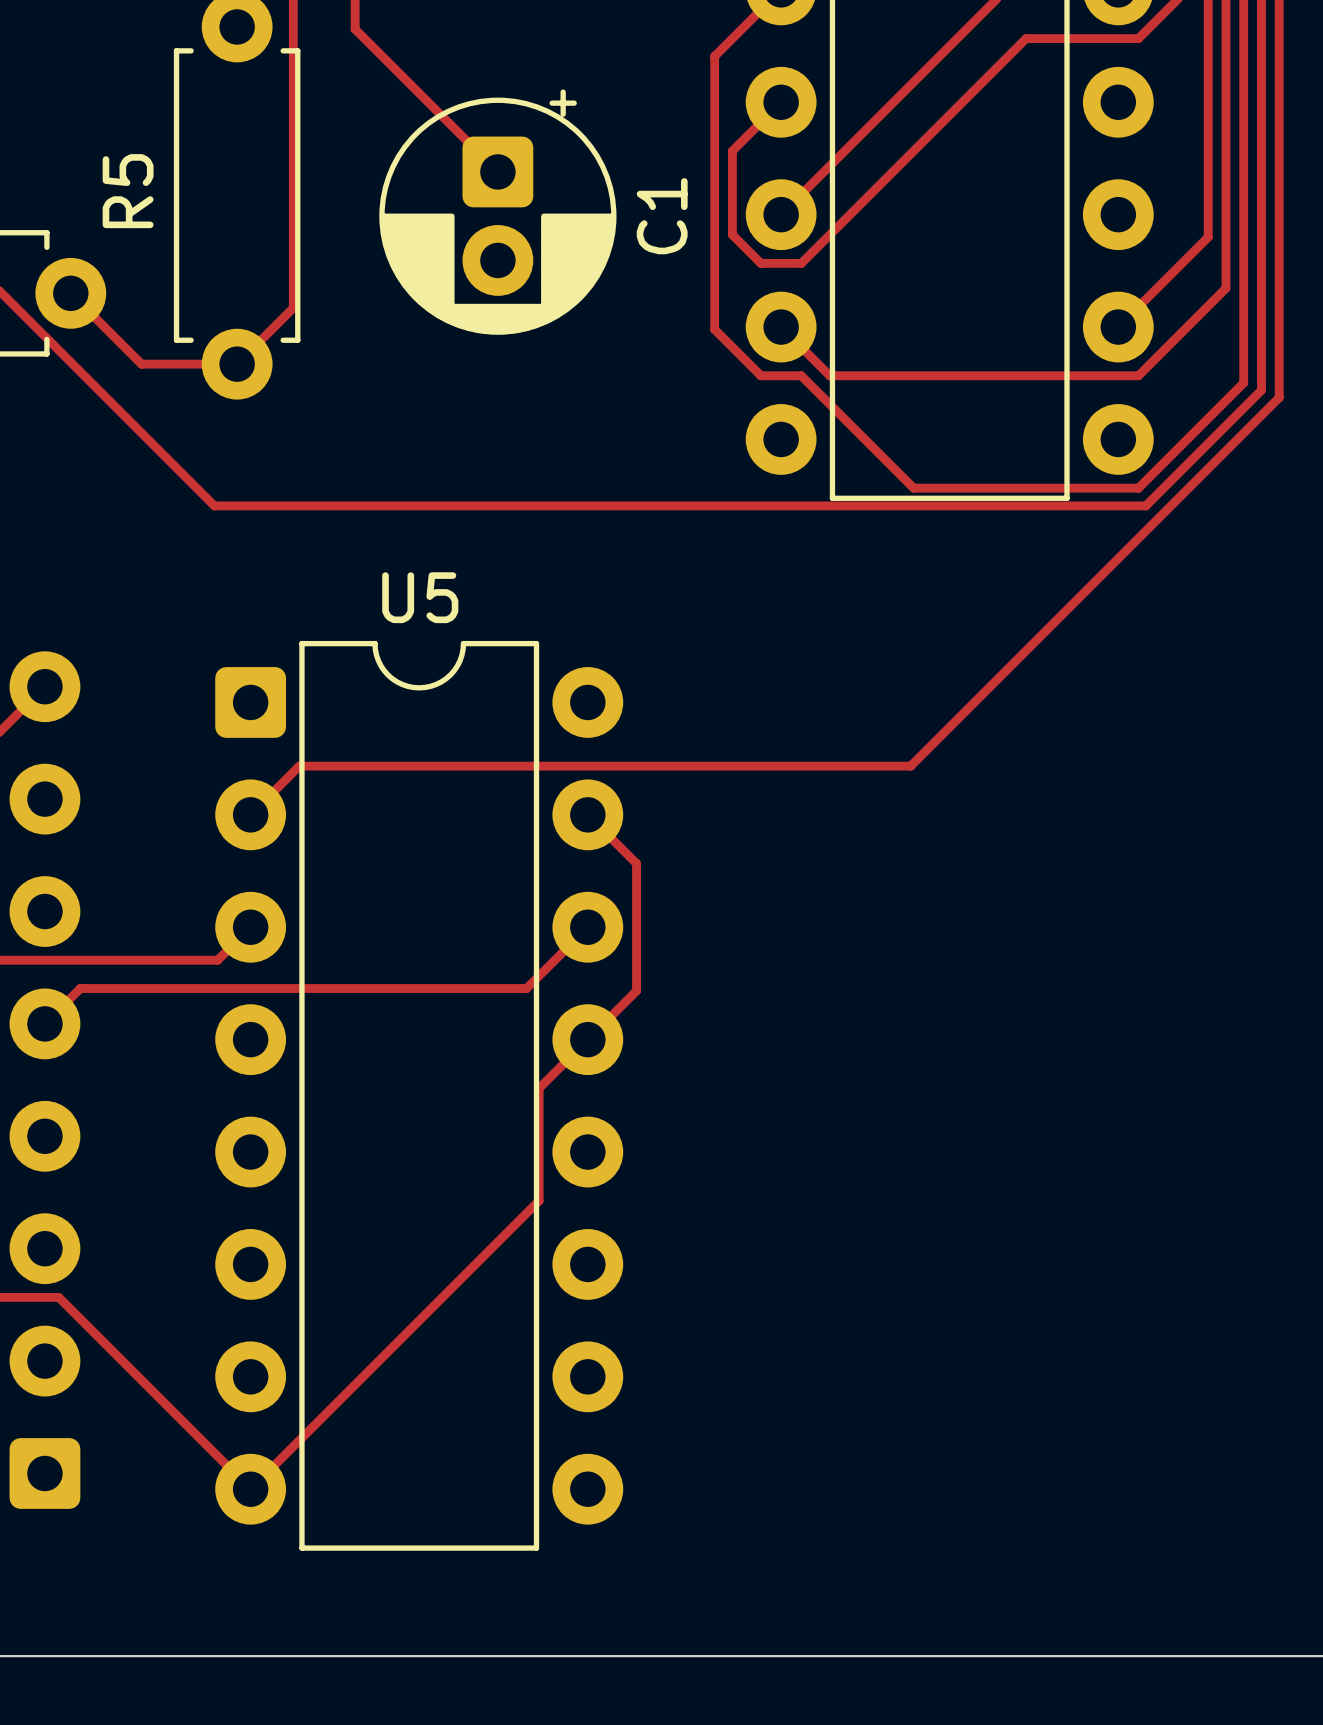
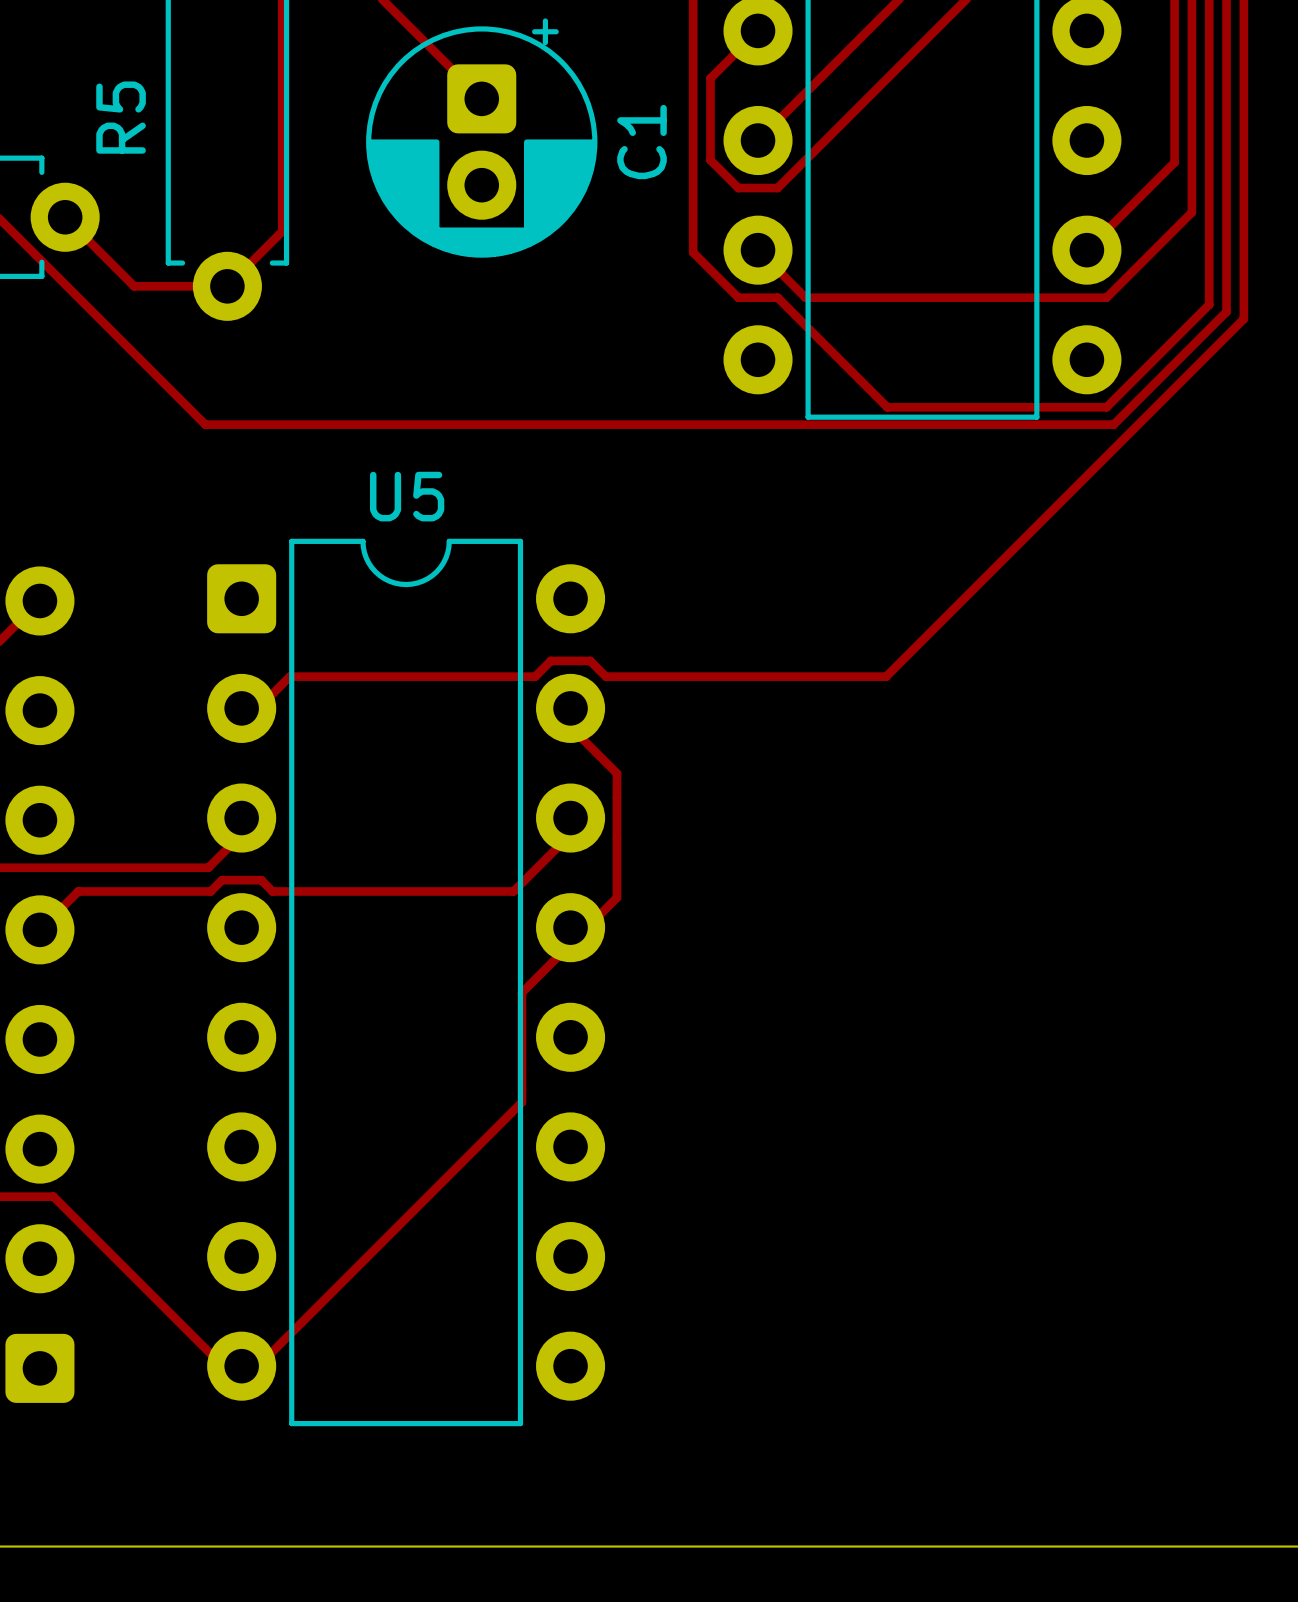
track: (912, 764) (910, 766) (299, 766) -> (886, 676) (605, 676) (590, 660) (550, 660) (535, 676) (289, 676) (288, 678)
track: (530, 984) (526, 988) (80, 988) -> (513, 891) (272, 891) (261, 880) (222, 880) (210, 891) (78, 891) (74, 895)
U5 position: (419, 1095) -> (406, 982)

